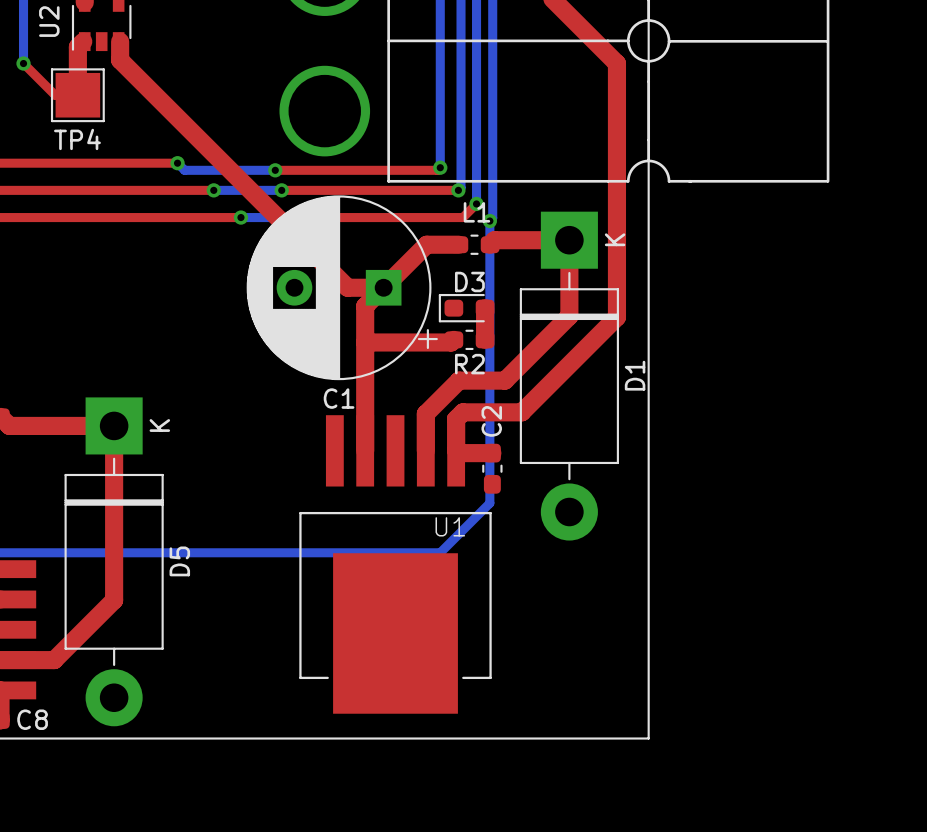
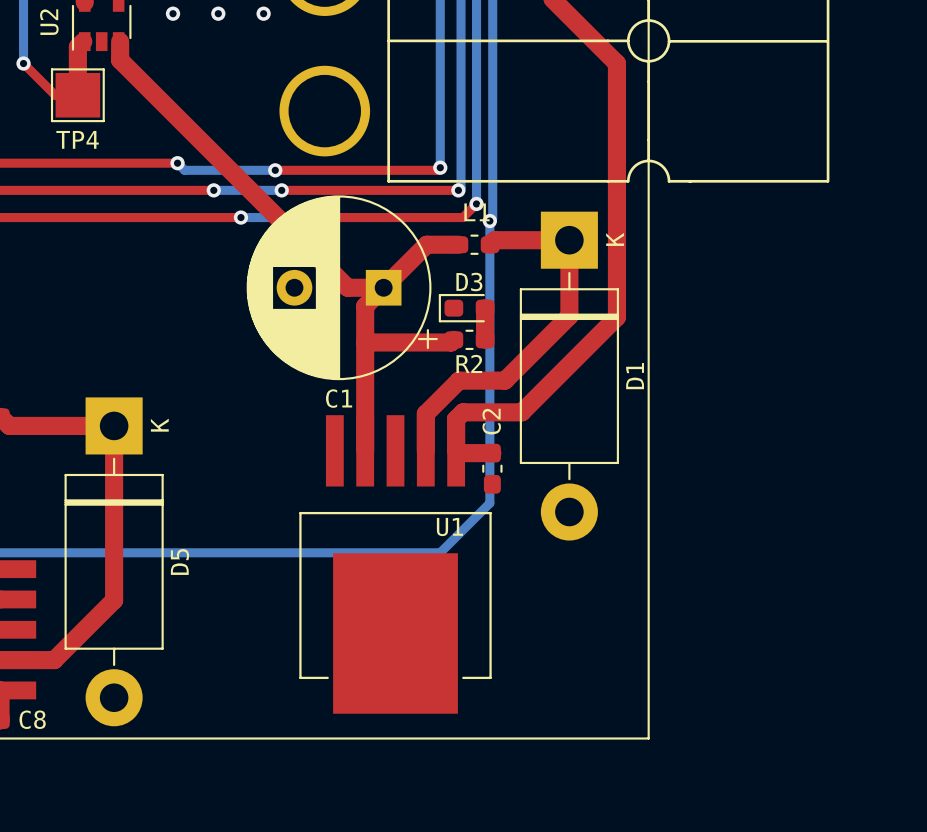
via: none -> (173, 13)
via: none -> (218, 13)
via: none -> (263, 13)

